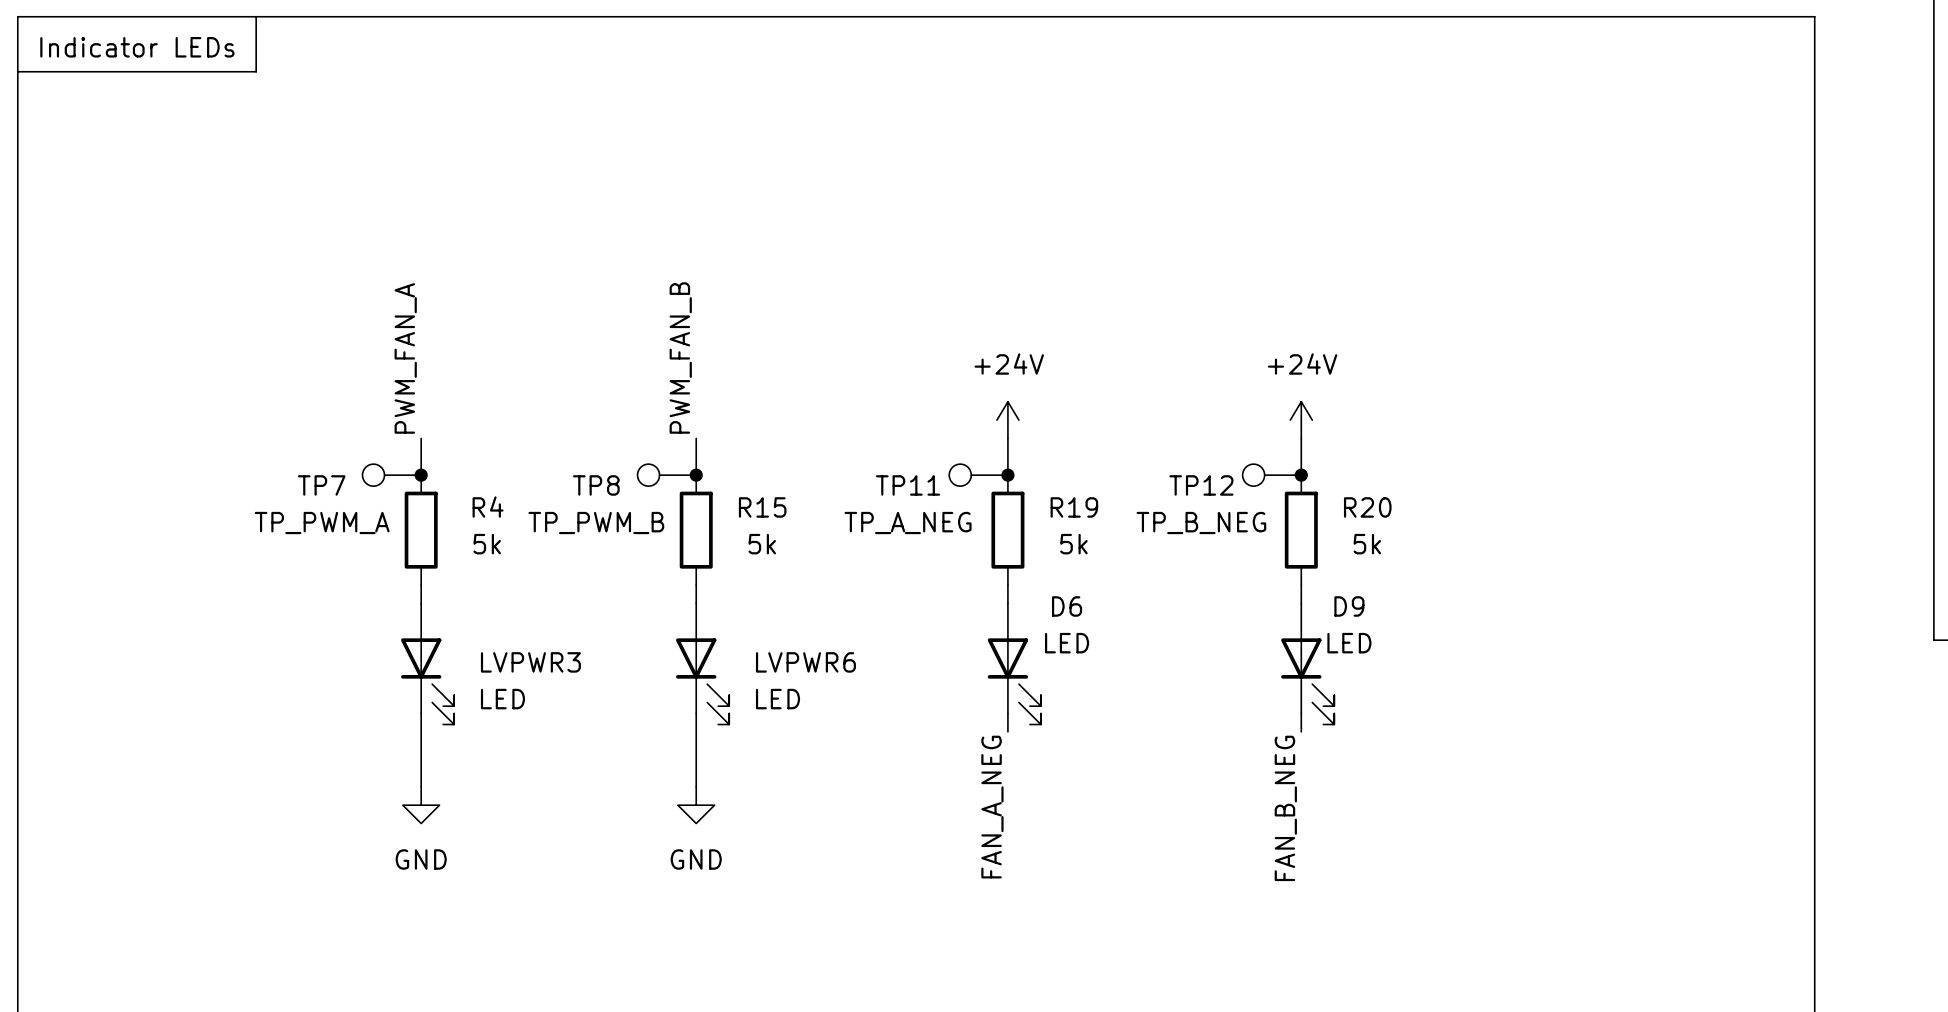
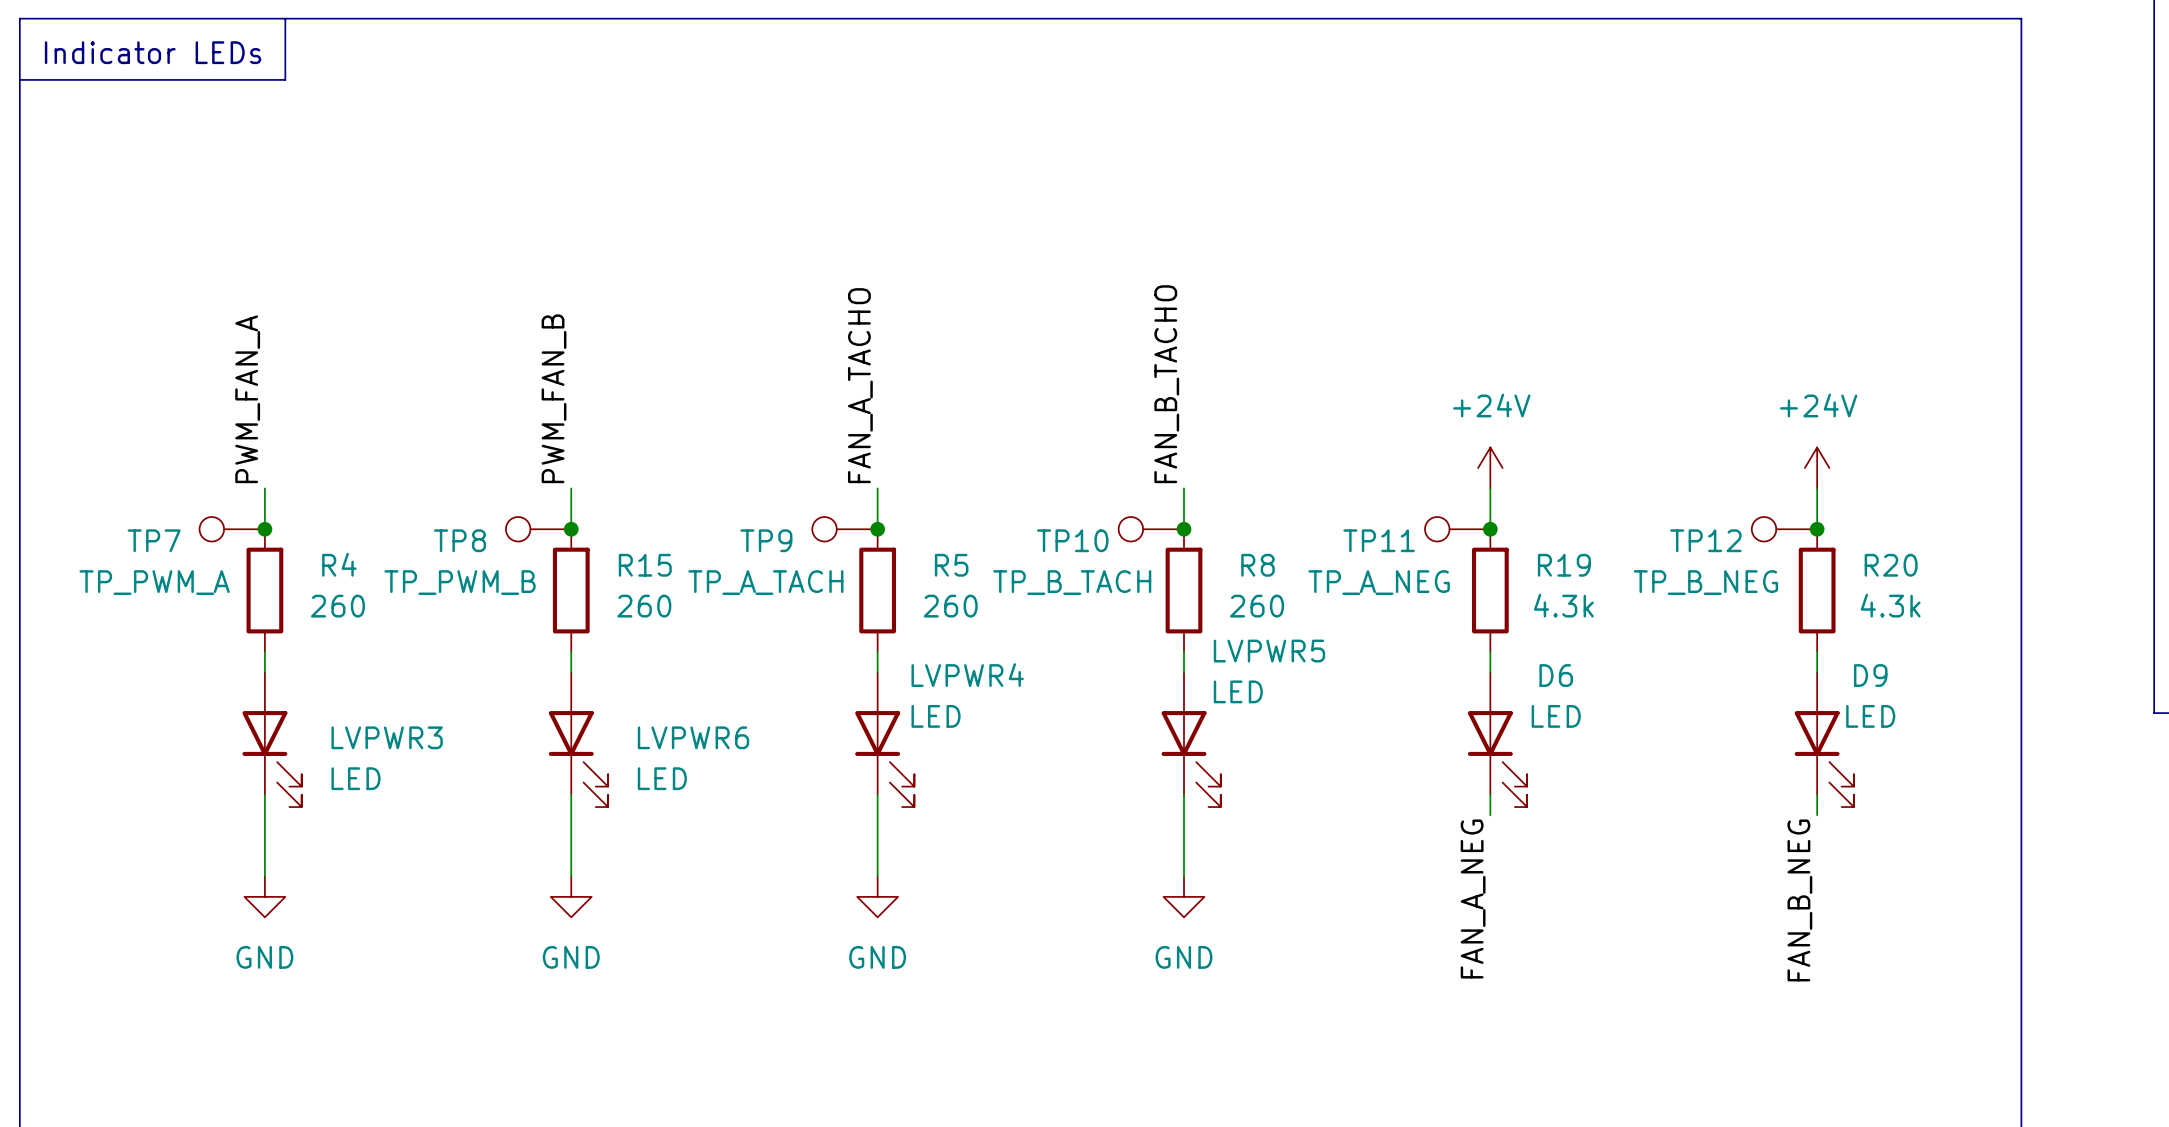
label: none -> FAN_B_TACHO (1166, 384)
label: none -> FAN_A_TACHO (860, 385)
label position: PWM_FAN_A (405, 358) -> PWM_FAN_A (247, 399)
label position: PWM_FAN_B (680, 358) -> PWM_FAN_B (554, 398)
power symbol: +24V (1007, 420) -> none
power symbol position: +24V (1301, 420) -> +24V (1490, 467)
power symbol: none -> +24V (1817, 467)
wire: none -> (264, 488) (264, 529)
wire: (421, 438) (421, 475) -> (571, 488) (571, 529)
wire: (696, 438) (696, 475) -> (877, 488) (877, 529)
wire: (1007, 438) (1007, 475) -> (1490, 488) (1490, 529)
wire: none -> (1184, 488) (1184, 529)
wire: (1301, 438) (1301, 475) -> (1817, 488) (1817, 529)
junction: none -> (264, 529)
TP7 position: (391, 475) -> (232, 529)
junction: (421, 475) -> none
junction: none -> (571, 529)
TP8 position: (666, 475) -> (538, 529)
junction: (696, 475) -> none
TP9: none -> TP_A_TACH (844, 529)
junction: none -> (877, 529)
TP11 position: (978, 475) -> (1457, 529)
junction position: (1007, 475) -> (1184, 529)
TP10: none -> TP_B_TACH (1151, 529)
TP12 position: (1271, 475) -> (1784, 529)
junction position: (1301, 475) -> (1490, 529)
junction: none -> (1817, 529)
R4 position: (421, 530) -> (264, 590)
R15 position: (696, 530) -> (571, 590)
R5: none -> 260 (877, 590)
R19 position: (1007, 530) -> (1490, 590)
R8: none -> 260 (1184, 590)
R20 position: (1301, 530) -> (1817, 590)
R4 value: 5k (487, 544) -> 260 (337, 606)
R15 value: 5k (762, 544) -> 260 (644, 606)
R19 value: 5k (1073, 544) -> 4.3k (1563, 605)
R20 value: 5k (1367, 544) -> 4.3k (1890, 605)
wire: none -> (264, 651) (264, 672)
wire: (421, 585) (421, 603) -> (571, 651) (571, 672)
wire: (696, 585) (696, 603) -> (877, 651) (877, 672)
wire: (1007, 585) (1007, 603) -> (1490, 651) (1490, 672)
wire: none -> (1184, 651) (1184, 672)
wire: (1301, 585) (1301, 603) -> (1817, 651) (1817, 672)
LVPWR3 position: (427, 664) -> (272, 739)
LVPWR6 position: (702, 664) -> (578, 739)
LVPWR4: none -> LED (884, 739)
D6 position: (1014, 664) -> (1497, 739)
LVPWR5: none -> LED (1191, 739)
D9 position: (1307, 664) -> (1824, 739)
wire: none -> (264, 794) (264, 876)
wire: (421, 713) (421, 786) -> (571, 794) (571, 876)
wire: (696, 713) (696, 786) -> (877, 794) (877, 876)
wire: (1007, 713) (1007, 731) -> (1490, 794) (1490, 815)
wire: none -> (1184, 794) (1184, 876)
wire: (1301, 713) (1301, 731) -> (1817, 794) (1817, 815)
power symbol: none -> GND (264, 896)
power symbol: GND (421, 805) -> none
power symbol: none -> GND (571, 896)
power symbol: GND (696, 805) -> none
power symbol: none -> GND (877, 896)
power symbol: none -> GND (1184, 896)
label position: FAN_A_NEG (992, 807) -> FAN_A_NEG (1473, 898)
label position: FAN_B_NEG (1285, 808) -> FAN_B_NEG (1799, 900)

